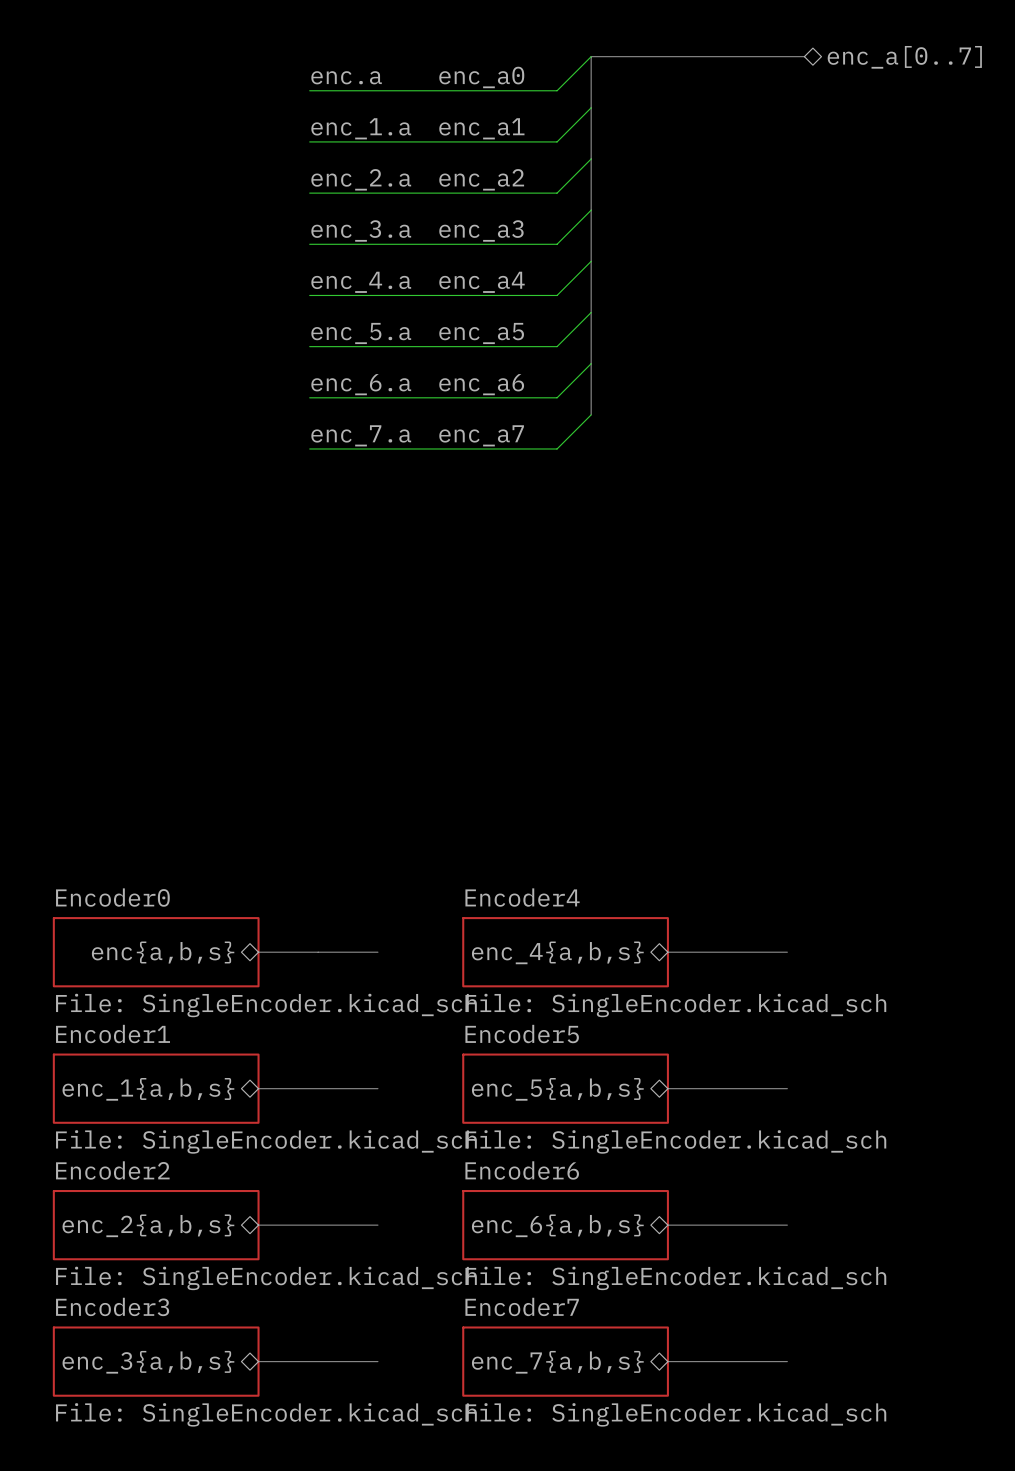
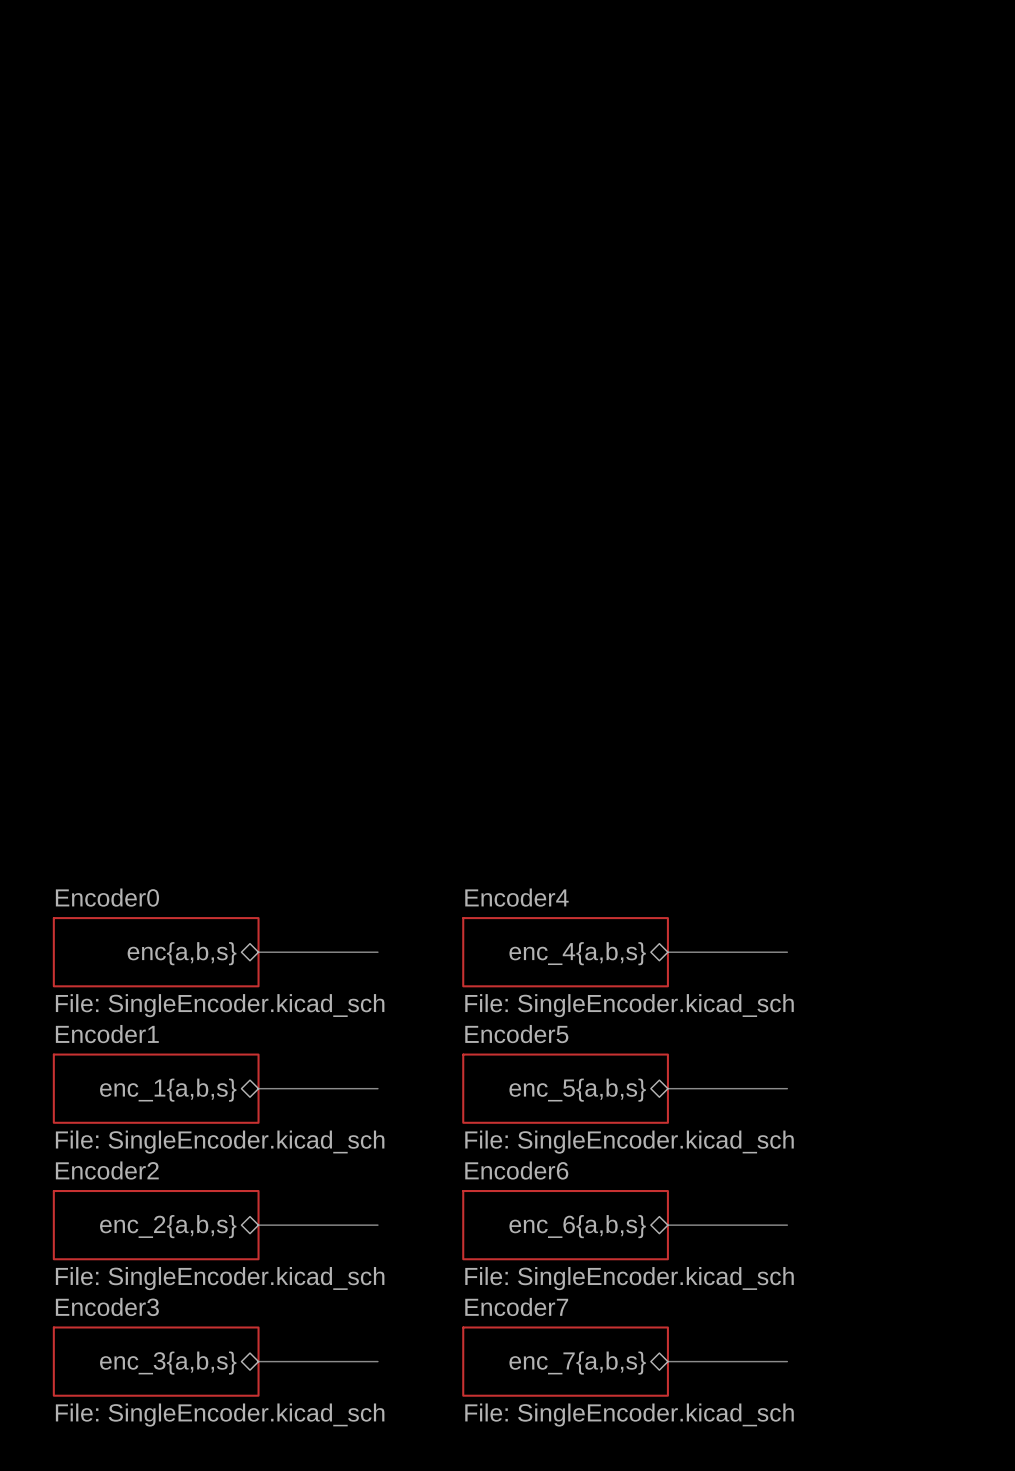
wire: (591, 56) (557, 90) (309, 90) -> none
bus: (804, 56) (591, 56) (591, 414) -> none
hierarchical label: enc_a[0..7] (904, 57) -> none
label: enc.a (346, 77) -> none
label: enc_a0 (481, 77) -> none
wire: (591, 107) (557, 141) (309, 141) -> none
label: enc_1.a (361, 128) -> none
label: enc_a1 (481, 128) -> none
wire: (591, 159) (557, 193) (309, 193) -> none
label: enc_2.a (361, 179) -> none
label: enc_a2 (481, 179) -> none
wire: (591, 210) (557, 244) -> none
label: enc_3.a (361, 230) -> none
label: enc_a3 (481, 230) -> none
wire: (309, 244) (557, 244) -> none
wire: (591, 261) (557, 295) -> none
label: enc_4.a (361, 282) -> none
label: enc_a4 (481, 282) -> none
wire: (309, 295) (557, 295) -> none
wire: (591, 312) (557, 346) -> none
label: enc_5.a (361, 333) -> none
label: enc_a5 (481, 333) -> none
wire: (309, 346) (557, 346) -> none
wire: (591, 363) (557, 397) (309, 397) -> none
label: enc_6.a (361, 384) -> none
label: enc_a6 (481, 384) -> none
wire: (591, 414) (557, 448) (309, 448) -> none
label: enc_7.a (361, 435) -> none
label: enc_a7 (481, 435) -> none

